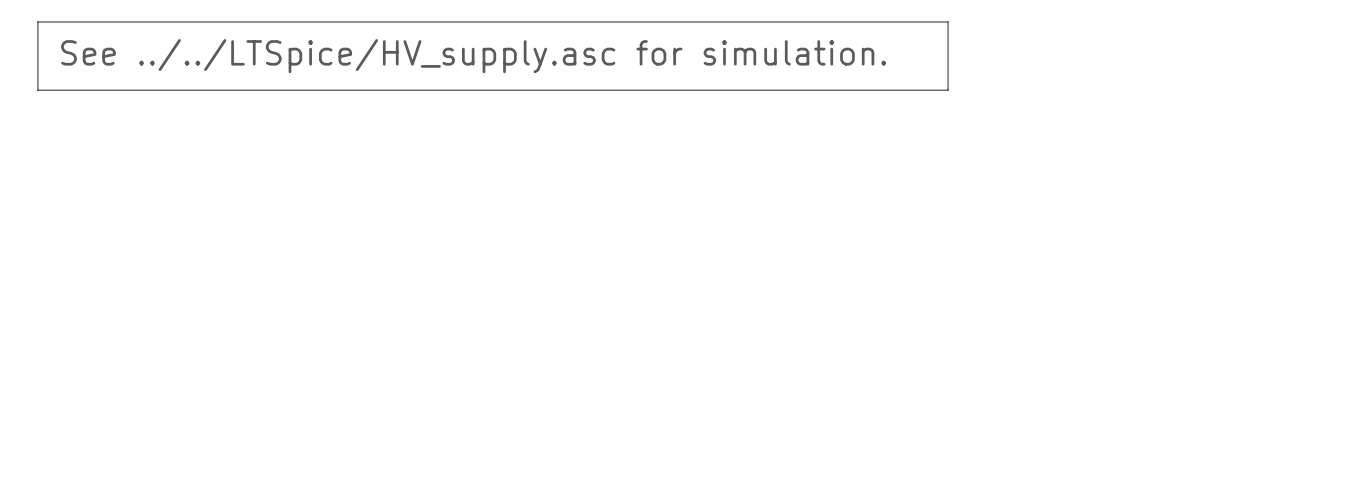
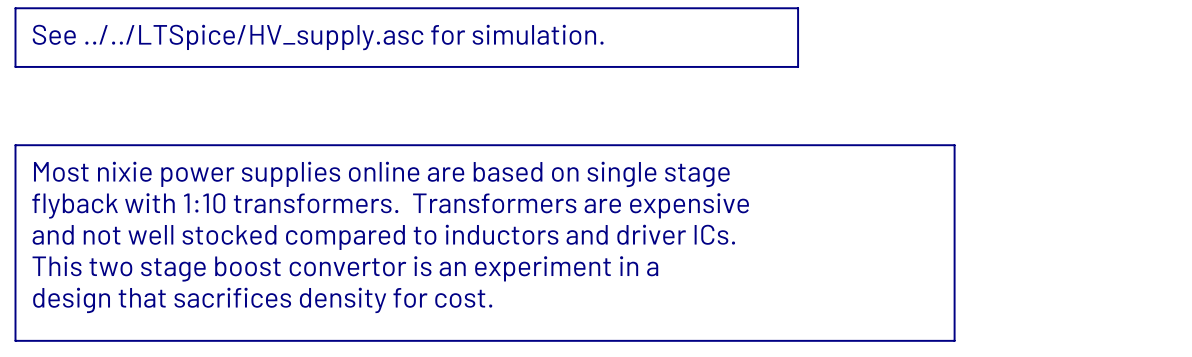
line: none -> (15, 145) (954, 145) (954, 340) (15, 340) (15, 145)
text: none -> Most nixie power supplies online are based on single stage (381, 174)
text: none -> flyback with 1:10 transformers. Transformers are expensive (390, 205)
text: none -> and not well stocked compared to inductors and driver ICs. (383, 237)
text: none -> This two stage boost convertor is an experiment in a (345, 268)
text: none -> design that sacrifices density for cost. (262, 300)

